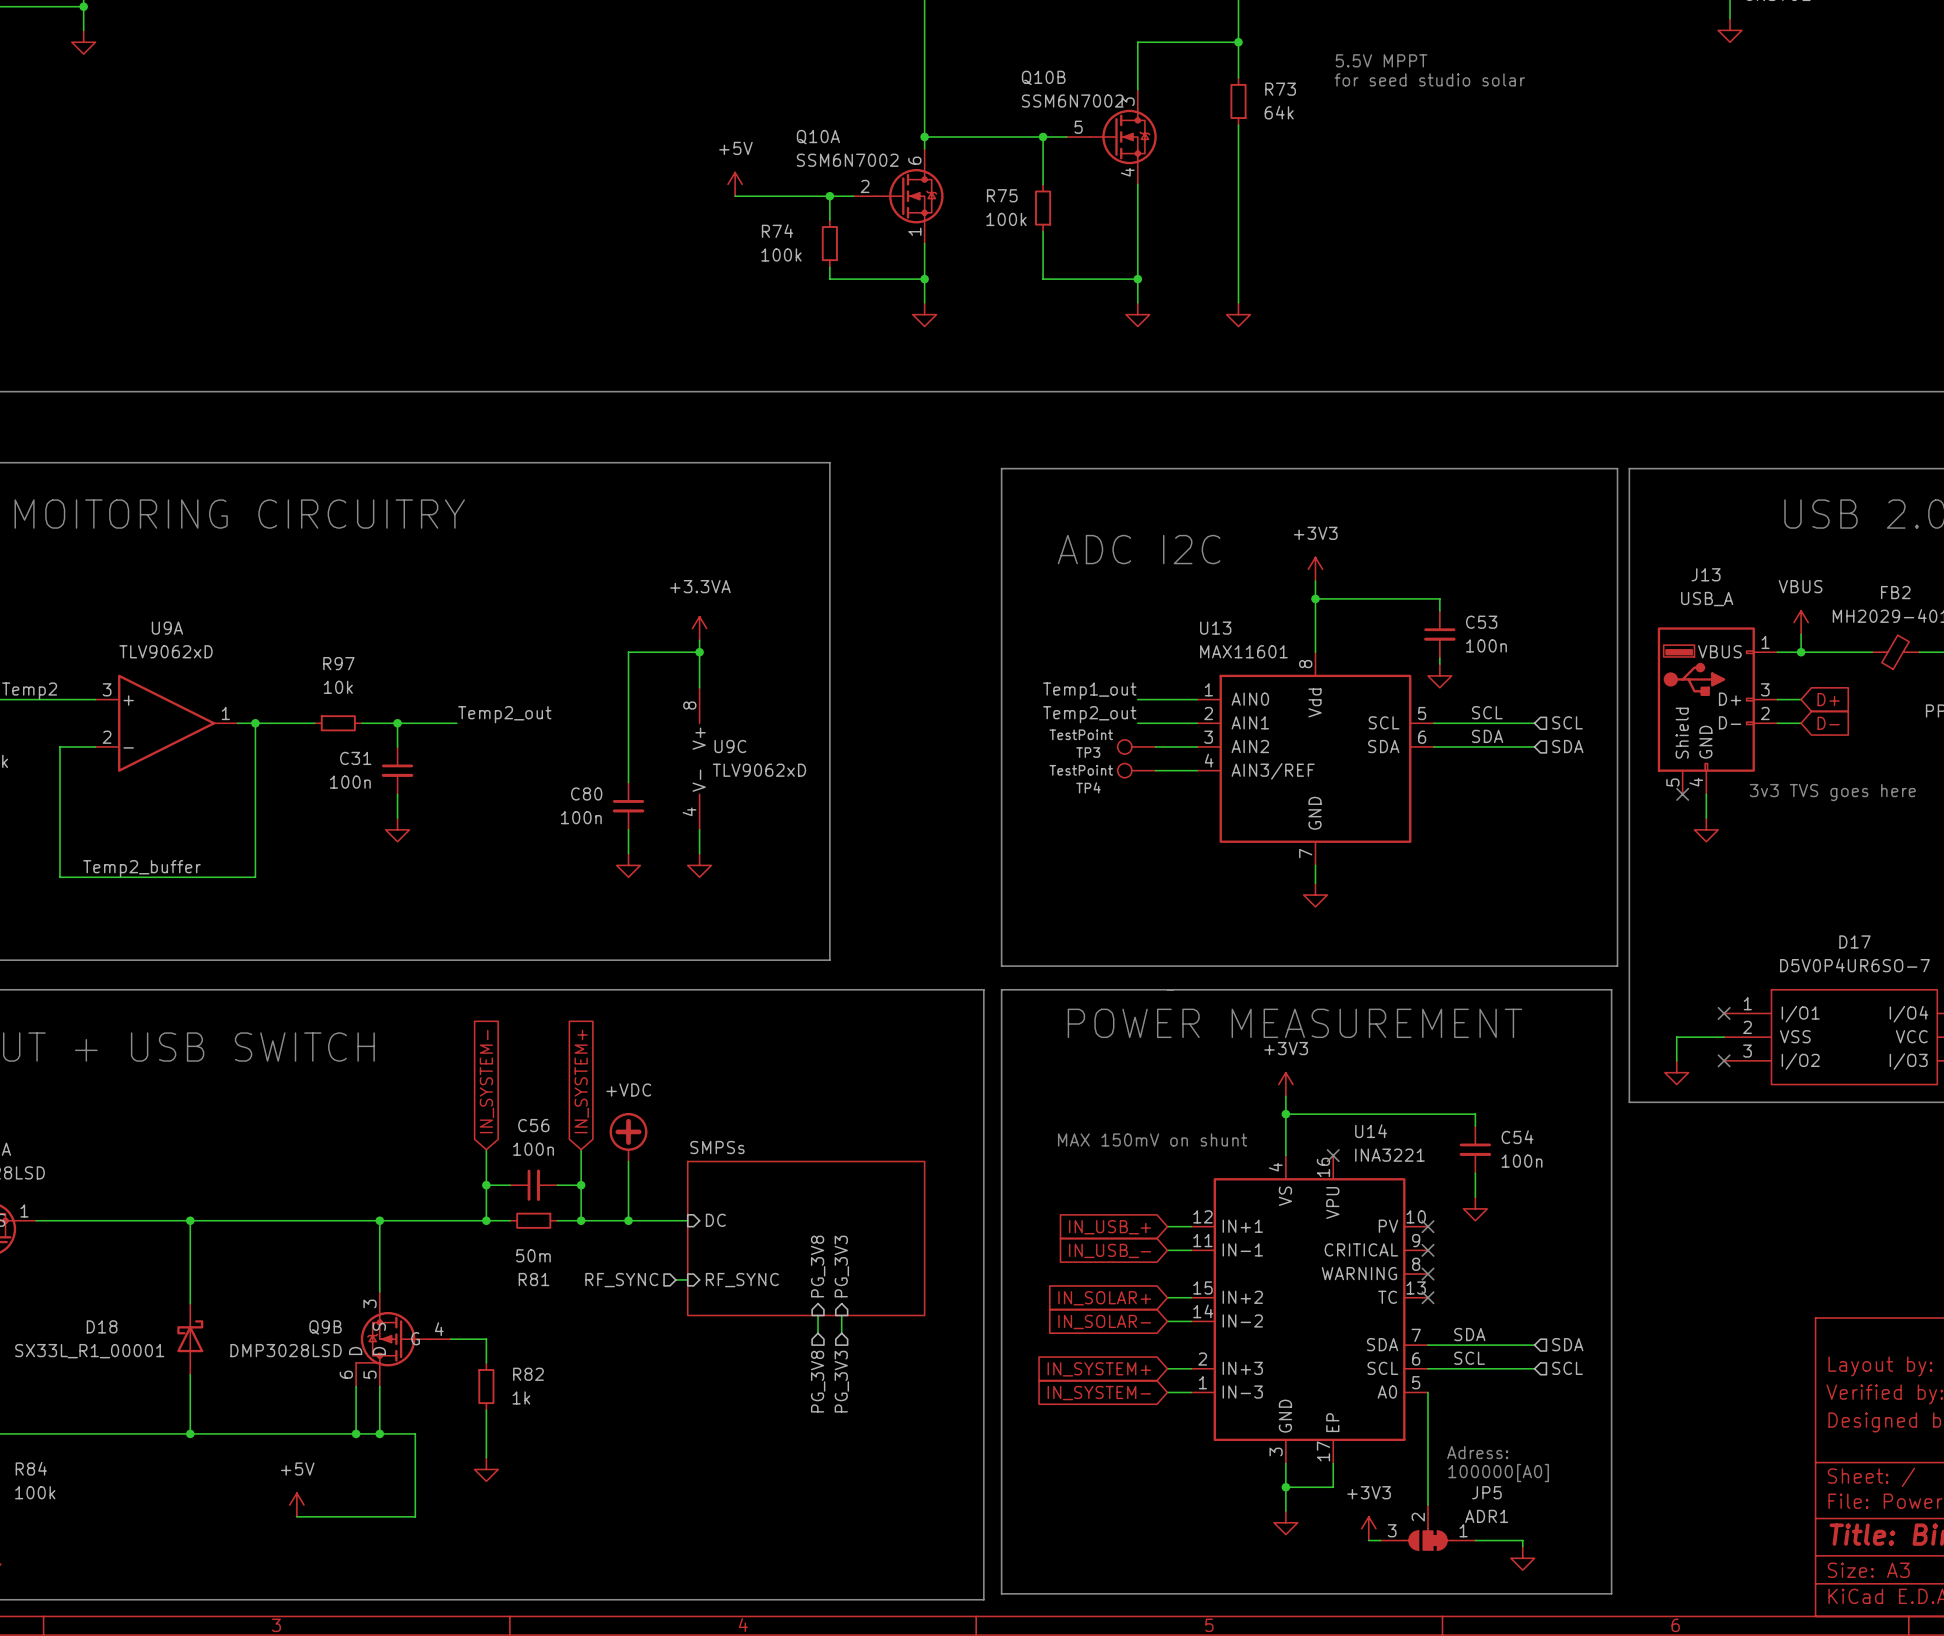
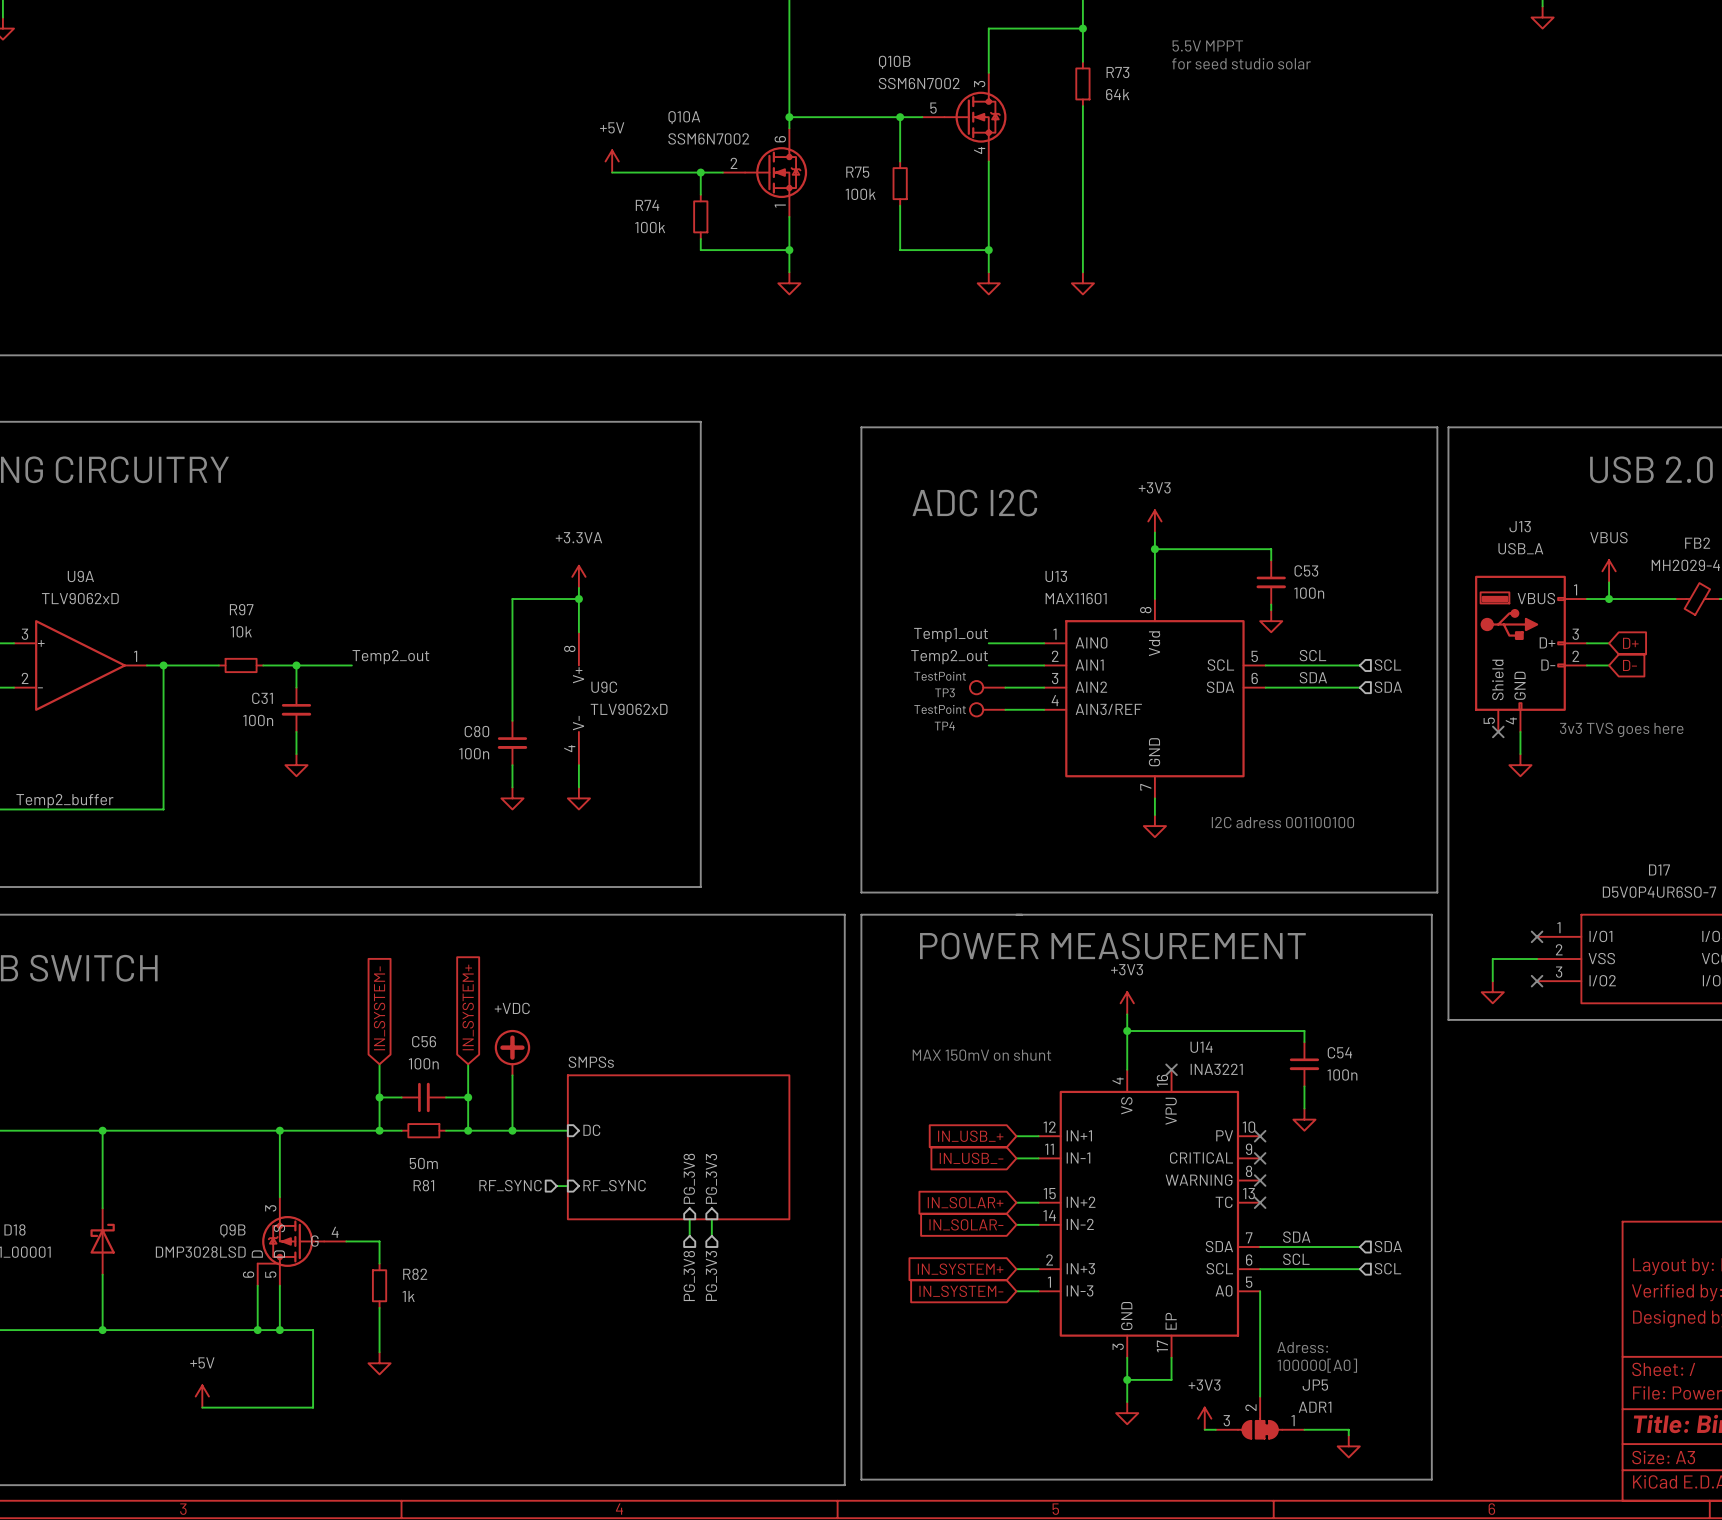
text: none -> I2C adress 001100100 (1282, 822)

